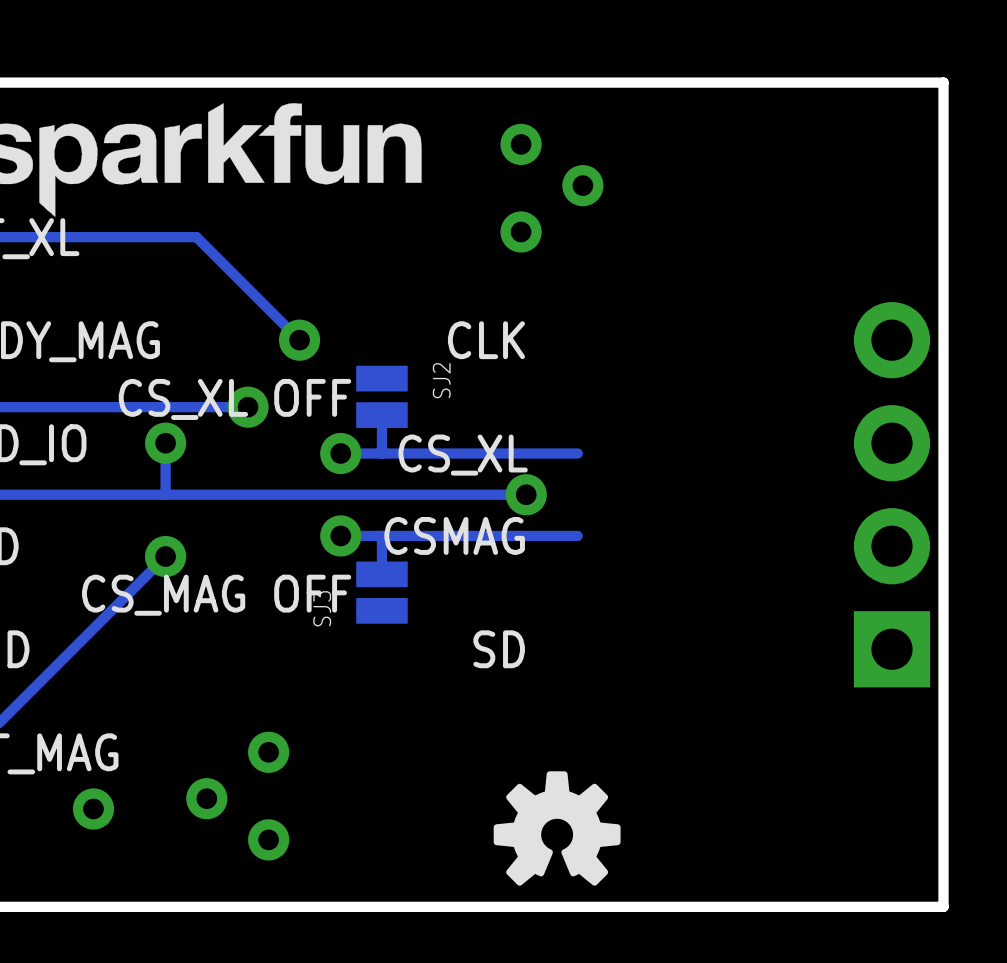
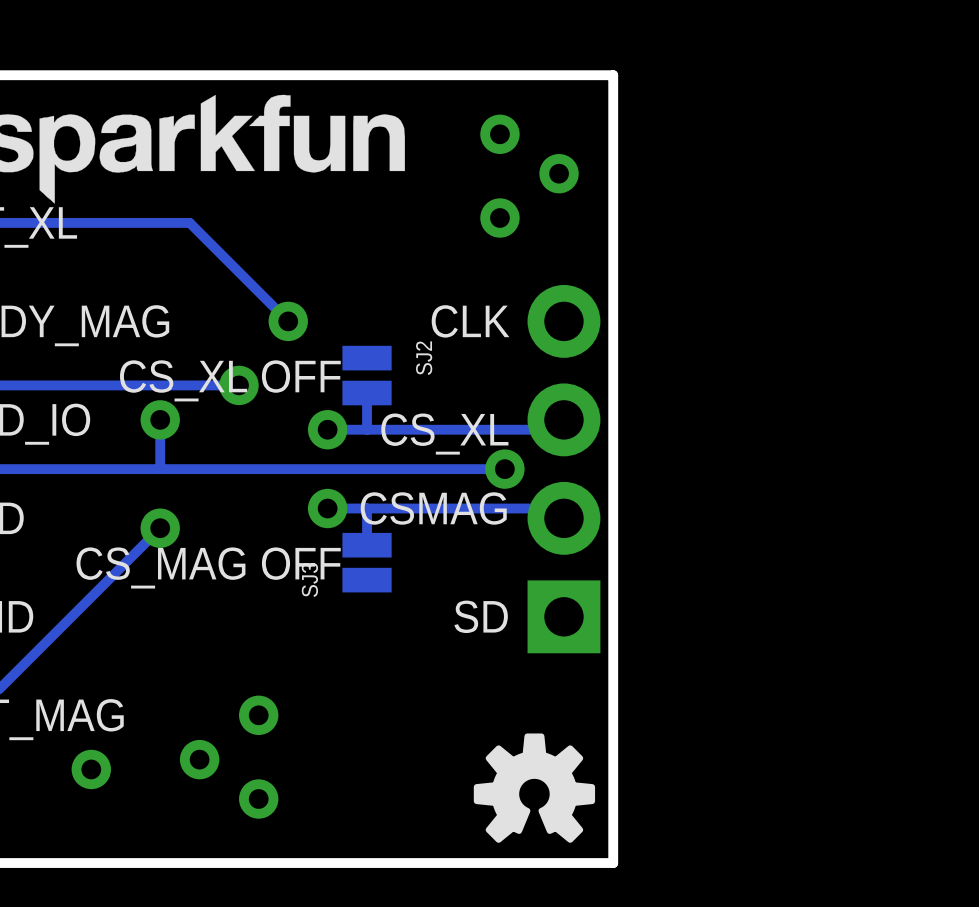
board edge: (639, 82) (943, 82) (943, 906) (639, 906) -> (613, 75) (613, 863)
part position: (891, 494) -> (563, 469)

